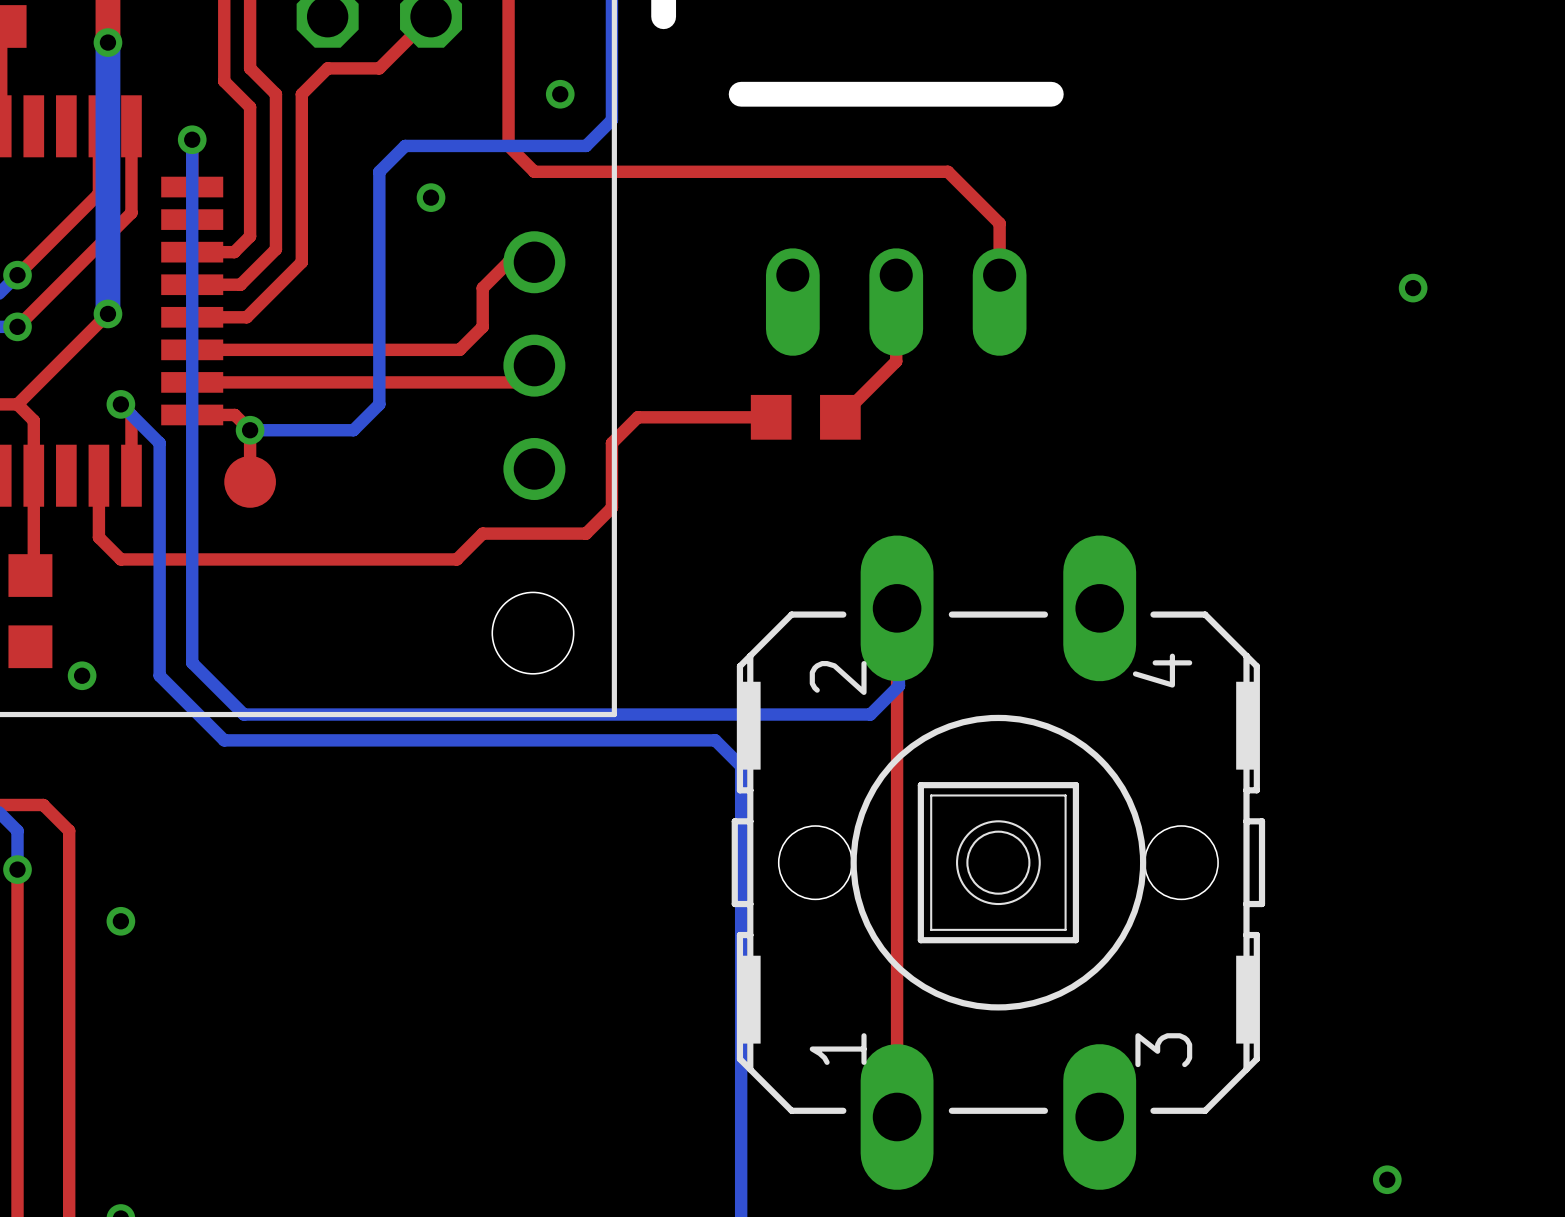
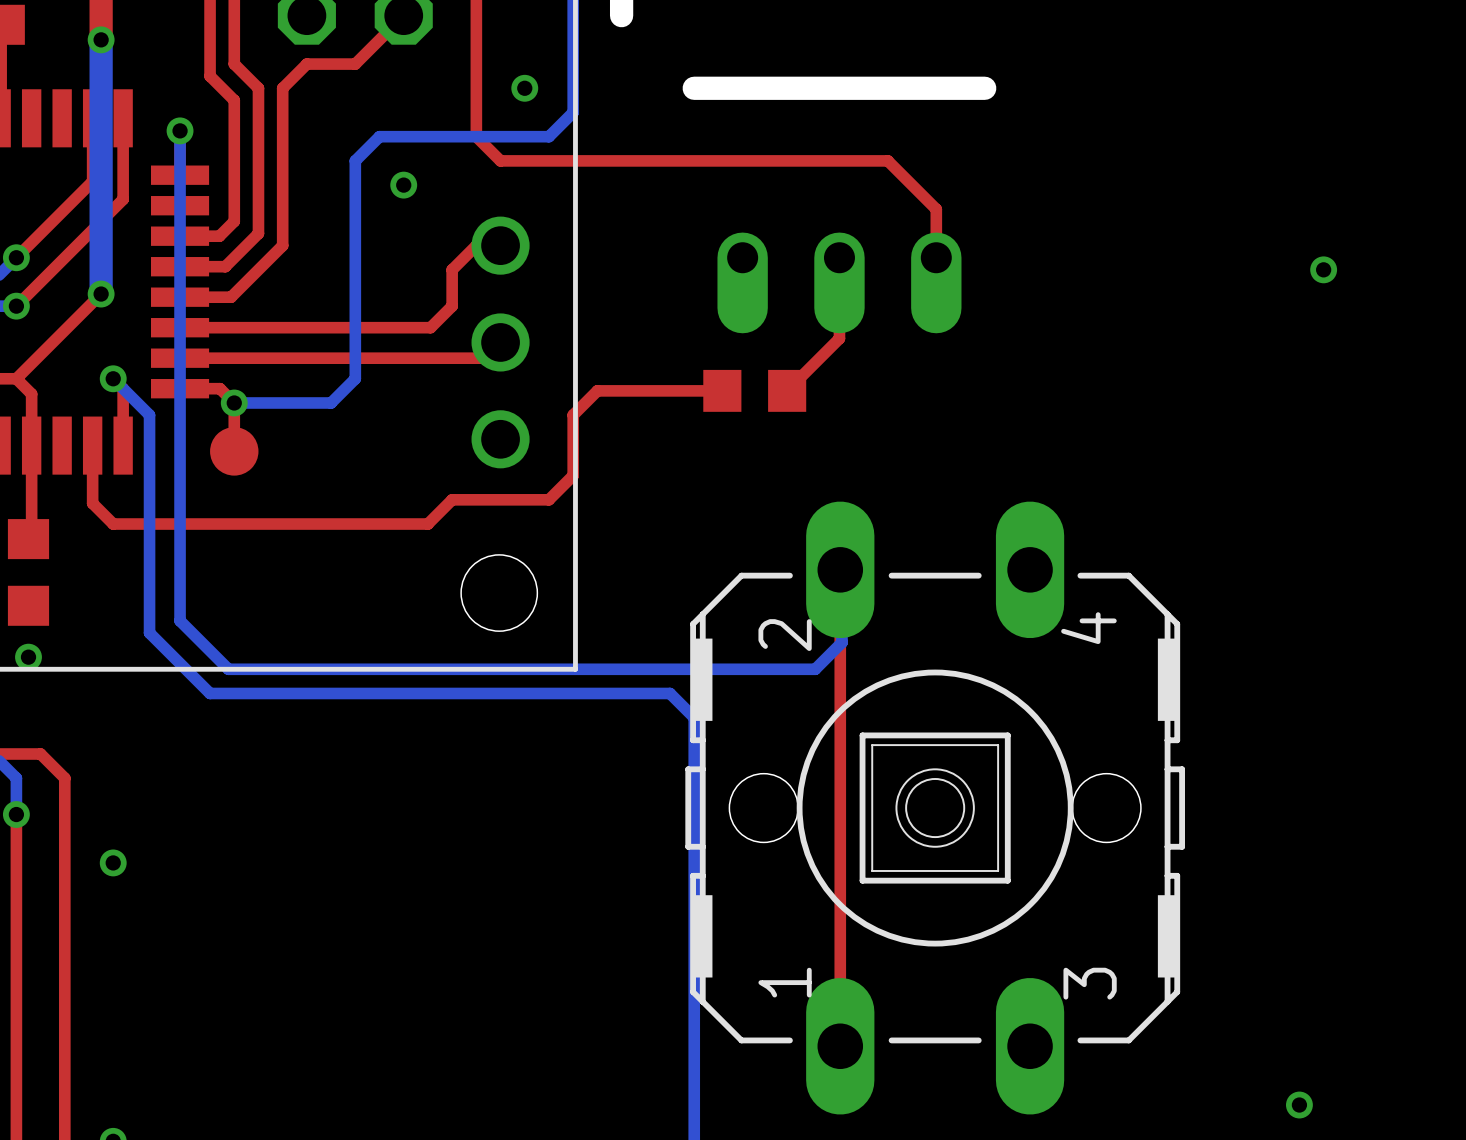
via position: (82, 675) -> (28, 657)

